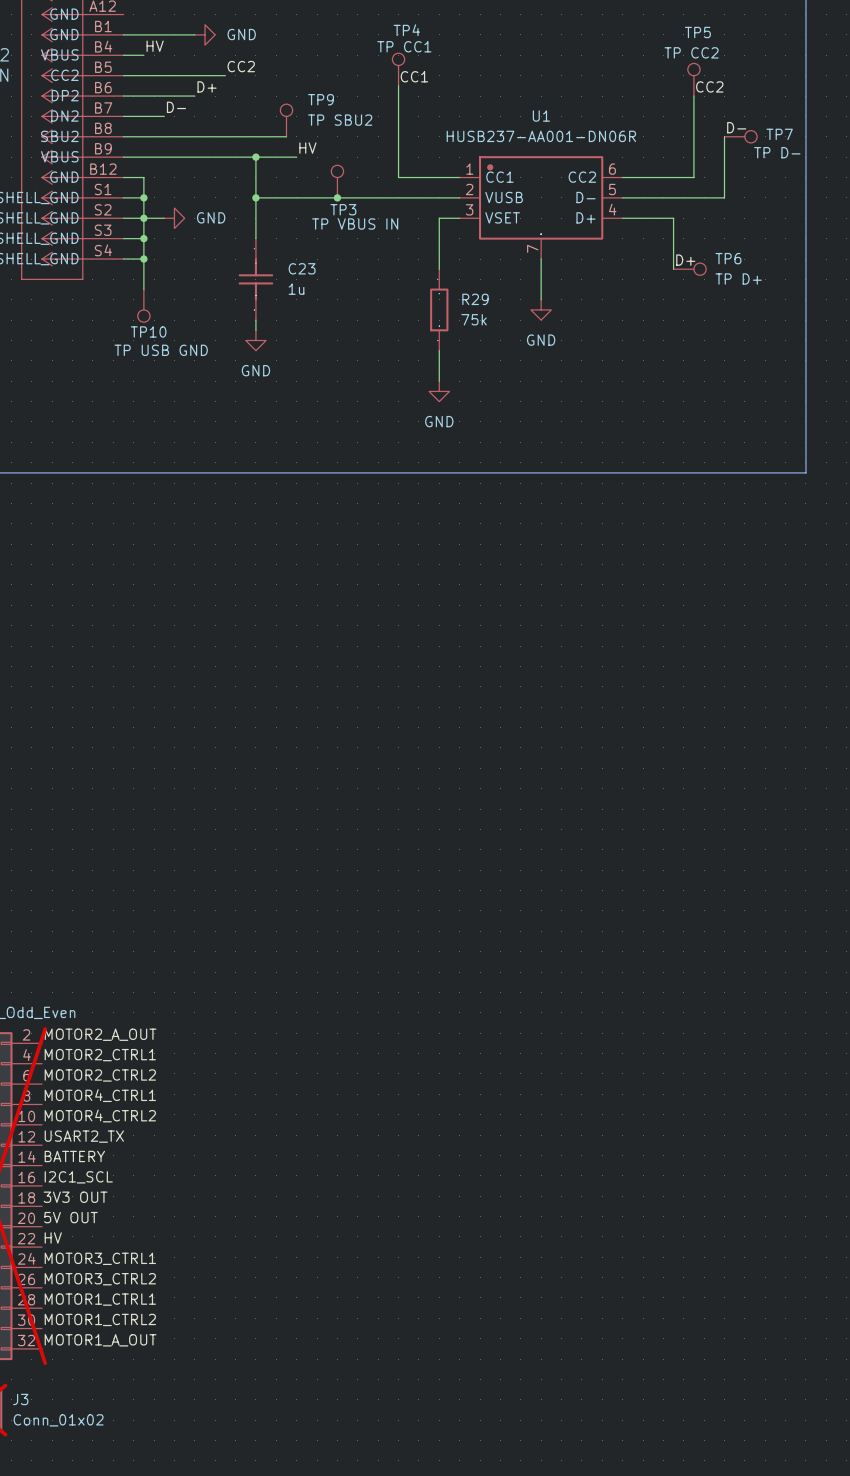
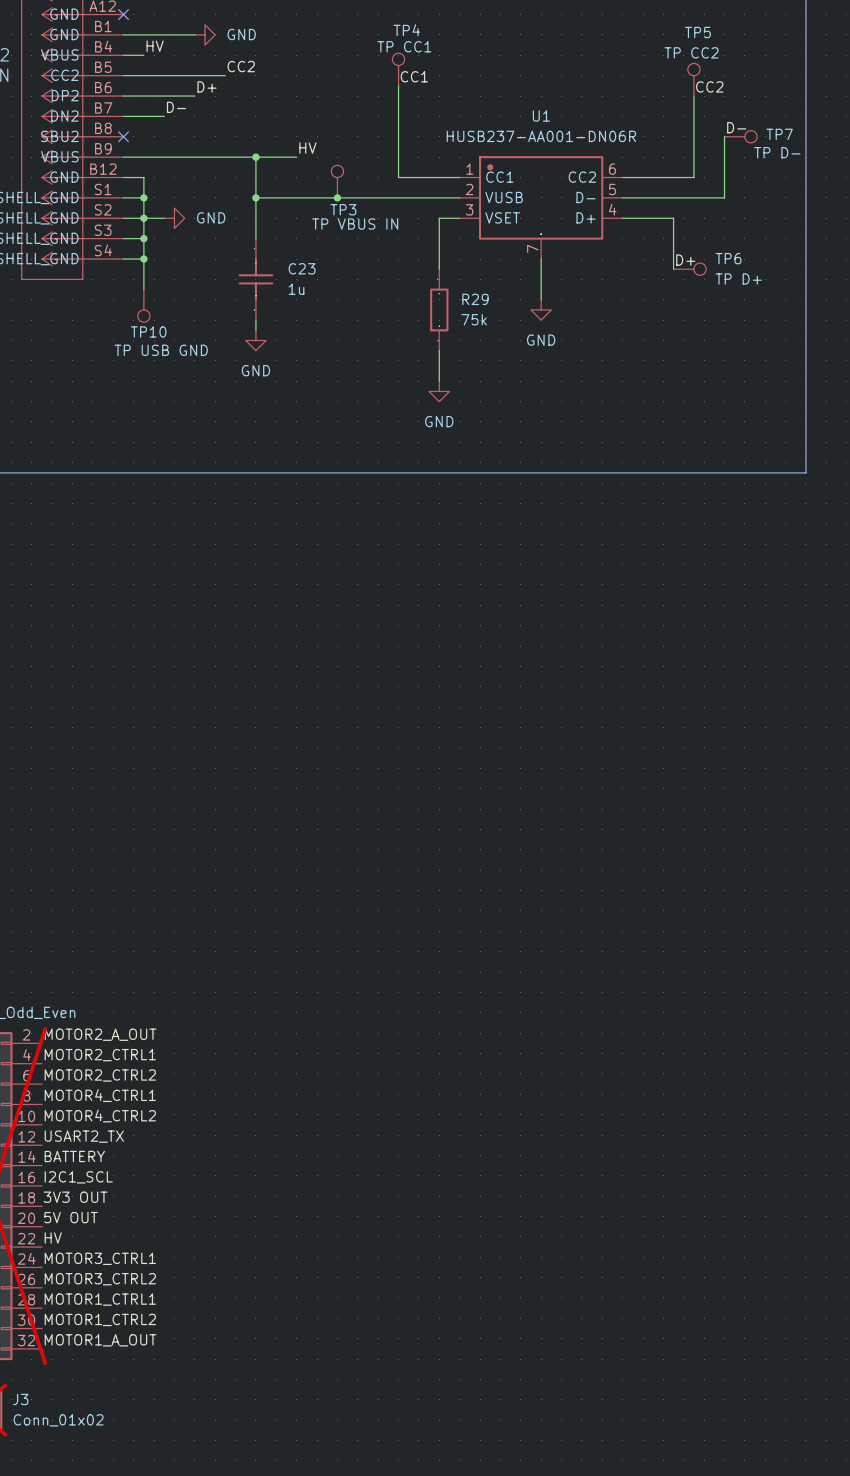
no-connect mark: none -> (123, 14)
TP9: TP SBU2 (286, 120) -> none
wire: (123, 136) (286, 136) -> none
no-connect mark: none -> (123, 136)

